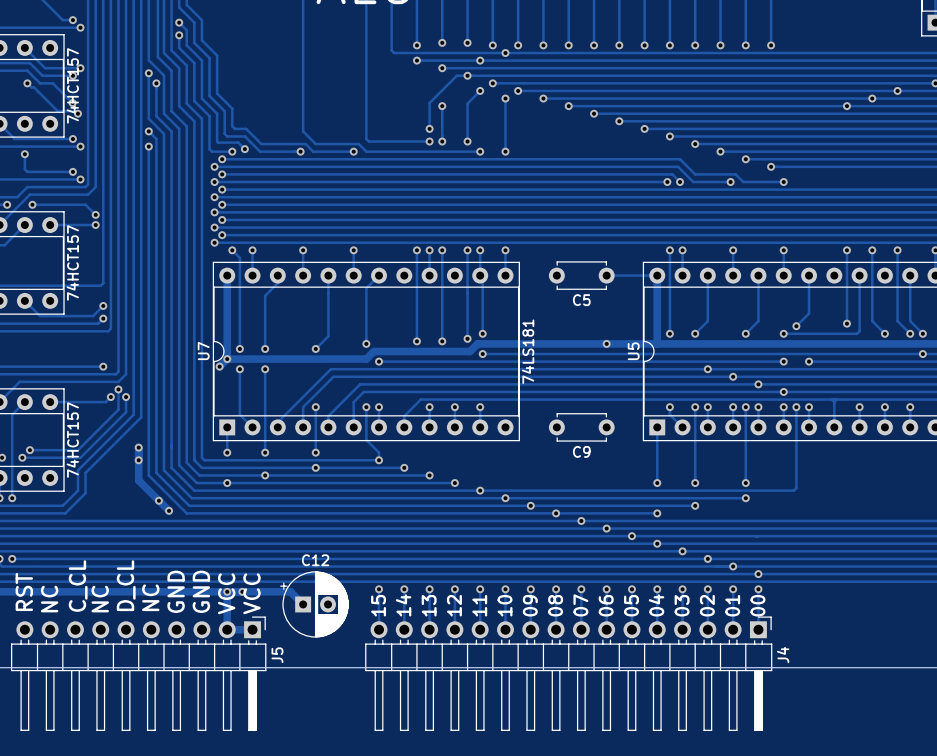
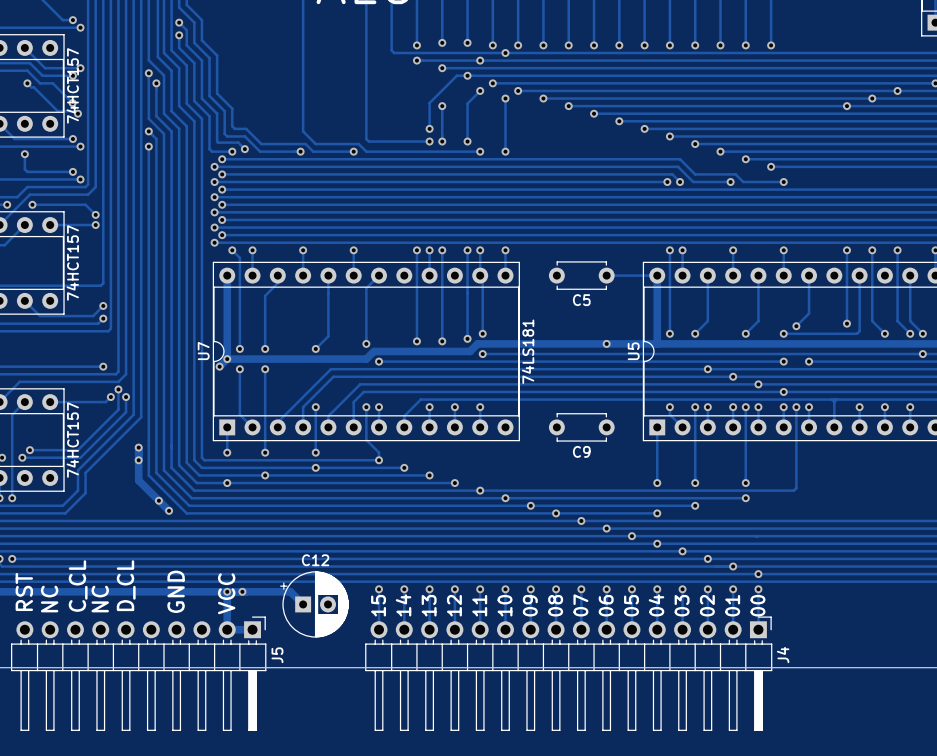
J5 text: GND (201, 591) -> none
J5 text: VCC (251, 593) -> none
J5 text: NC (150, 597) -> none

